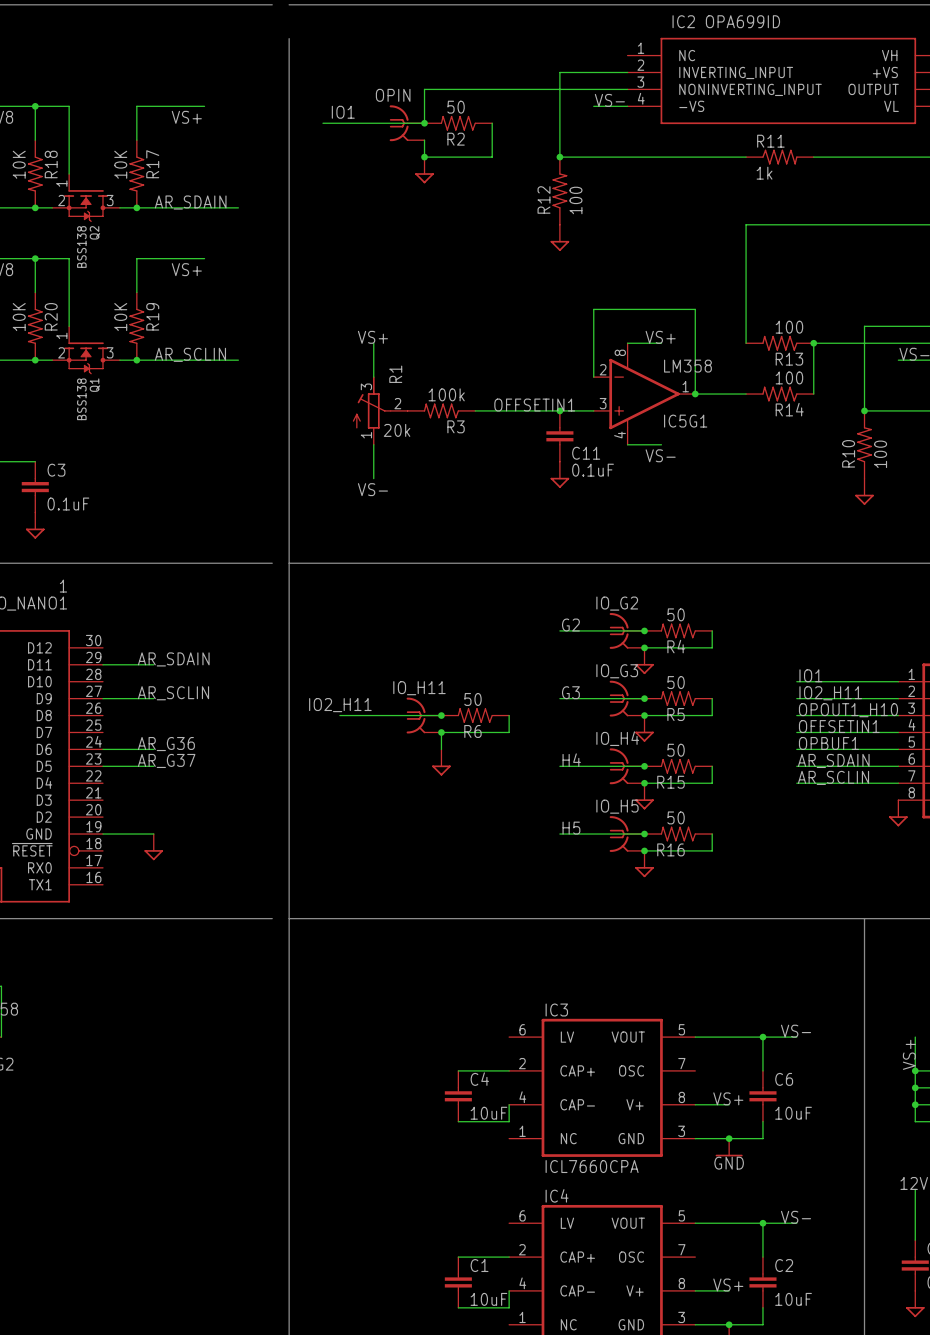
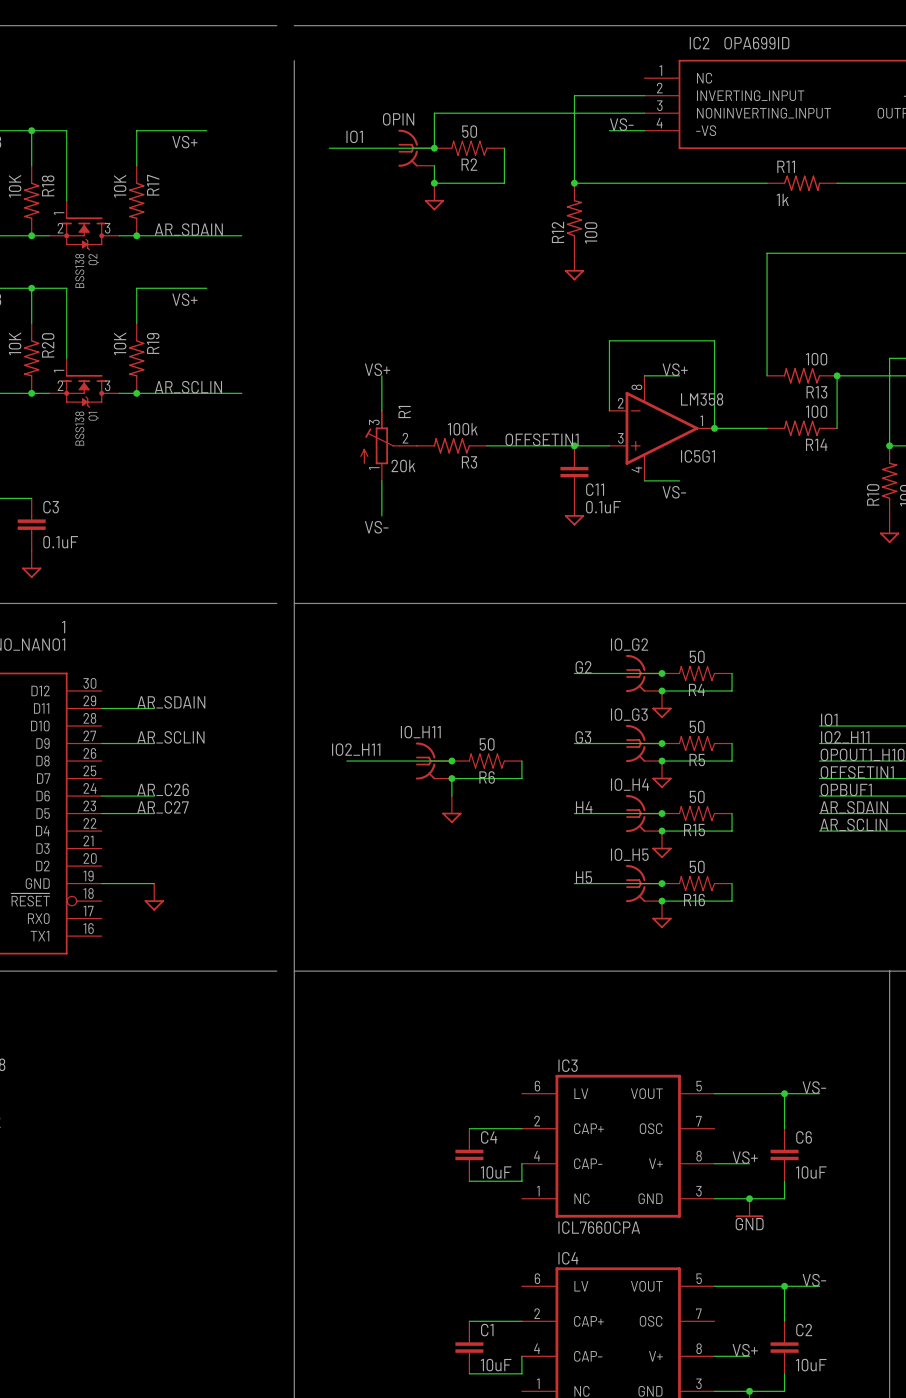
label: AR_G36 (166, 744) -> AR_C26 (163, 789)
label: AR_G37 (166, 760) -> AR_C27 (162, 807)

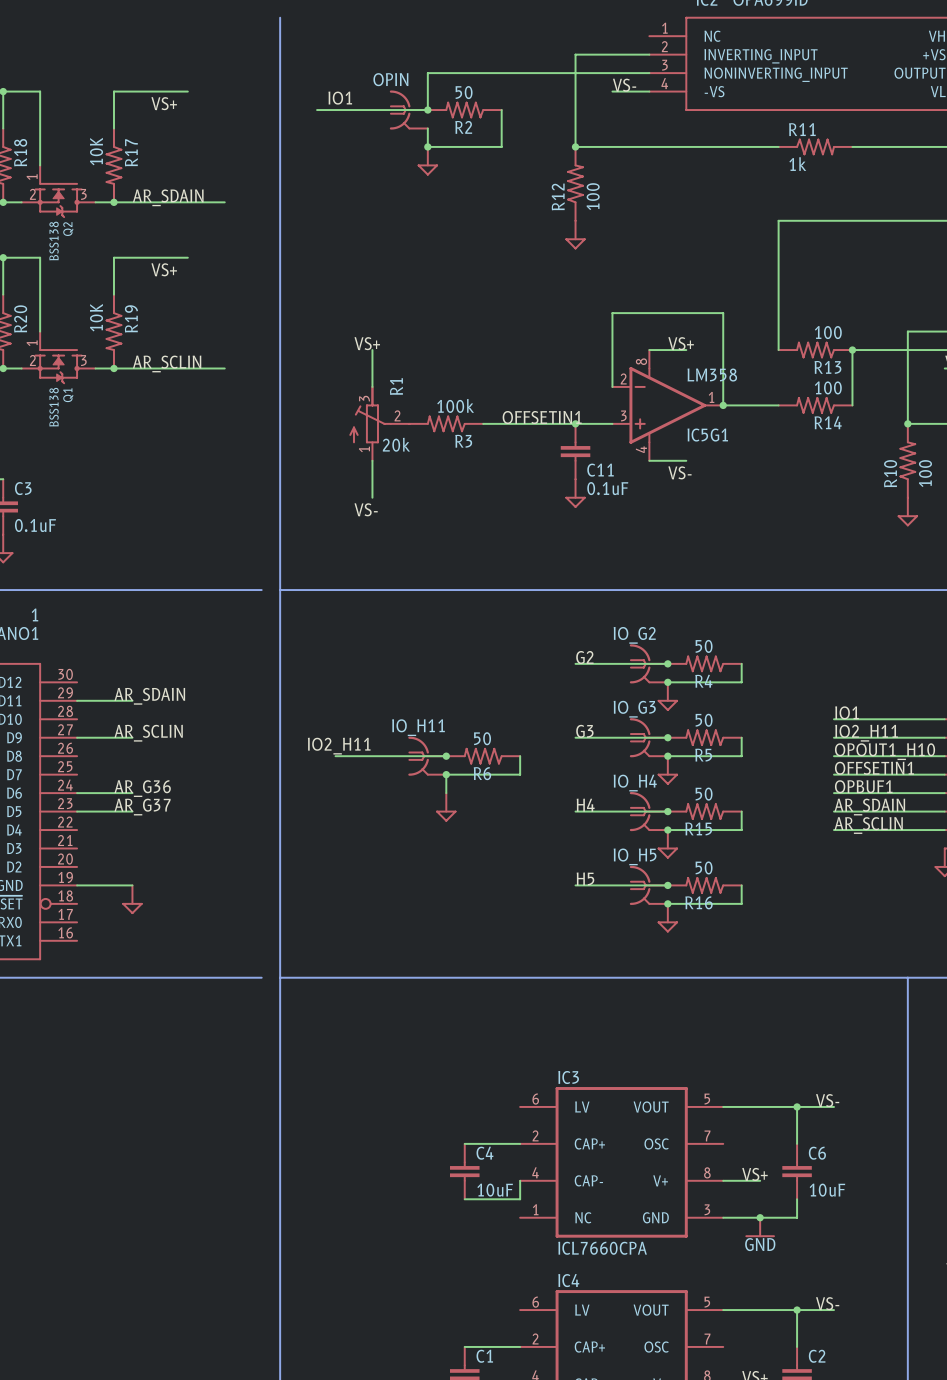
label: AR_C26 (163, 789) -> AR_G36 (142, 788)
label: AR_C27 (162, 807) -> AR_G37 (142, 807)

